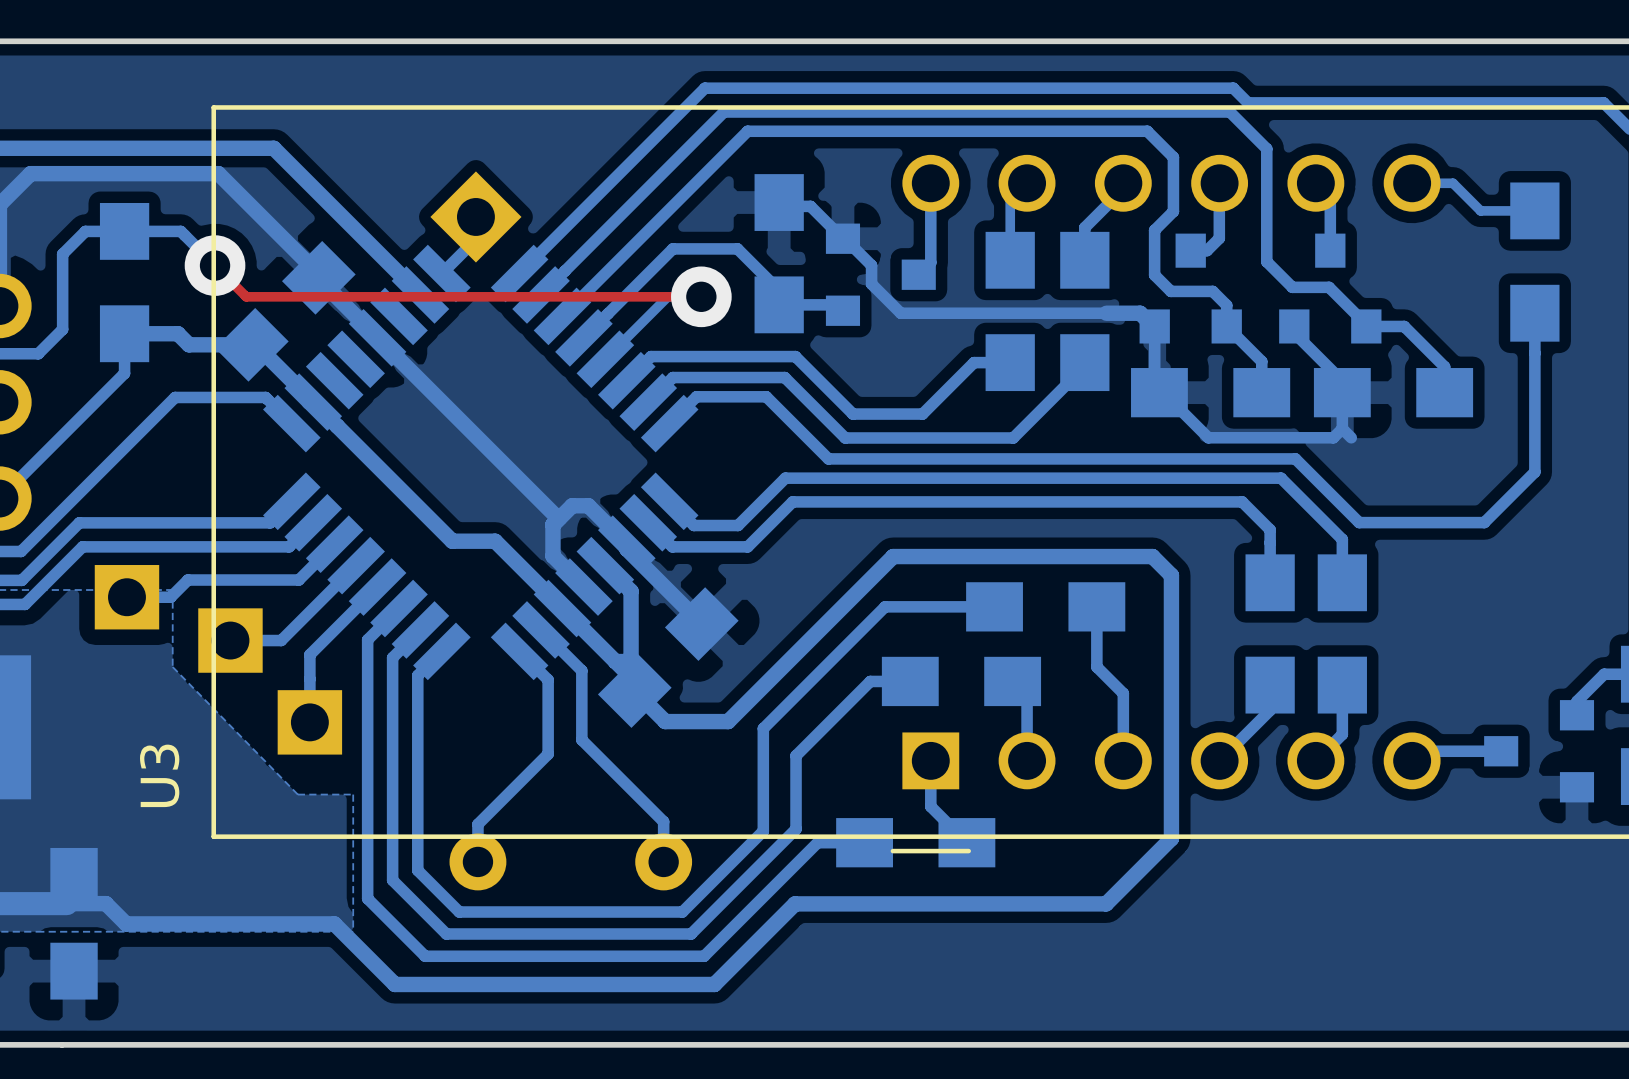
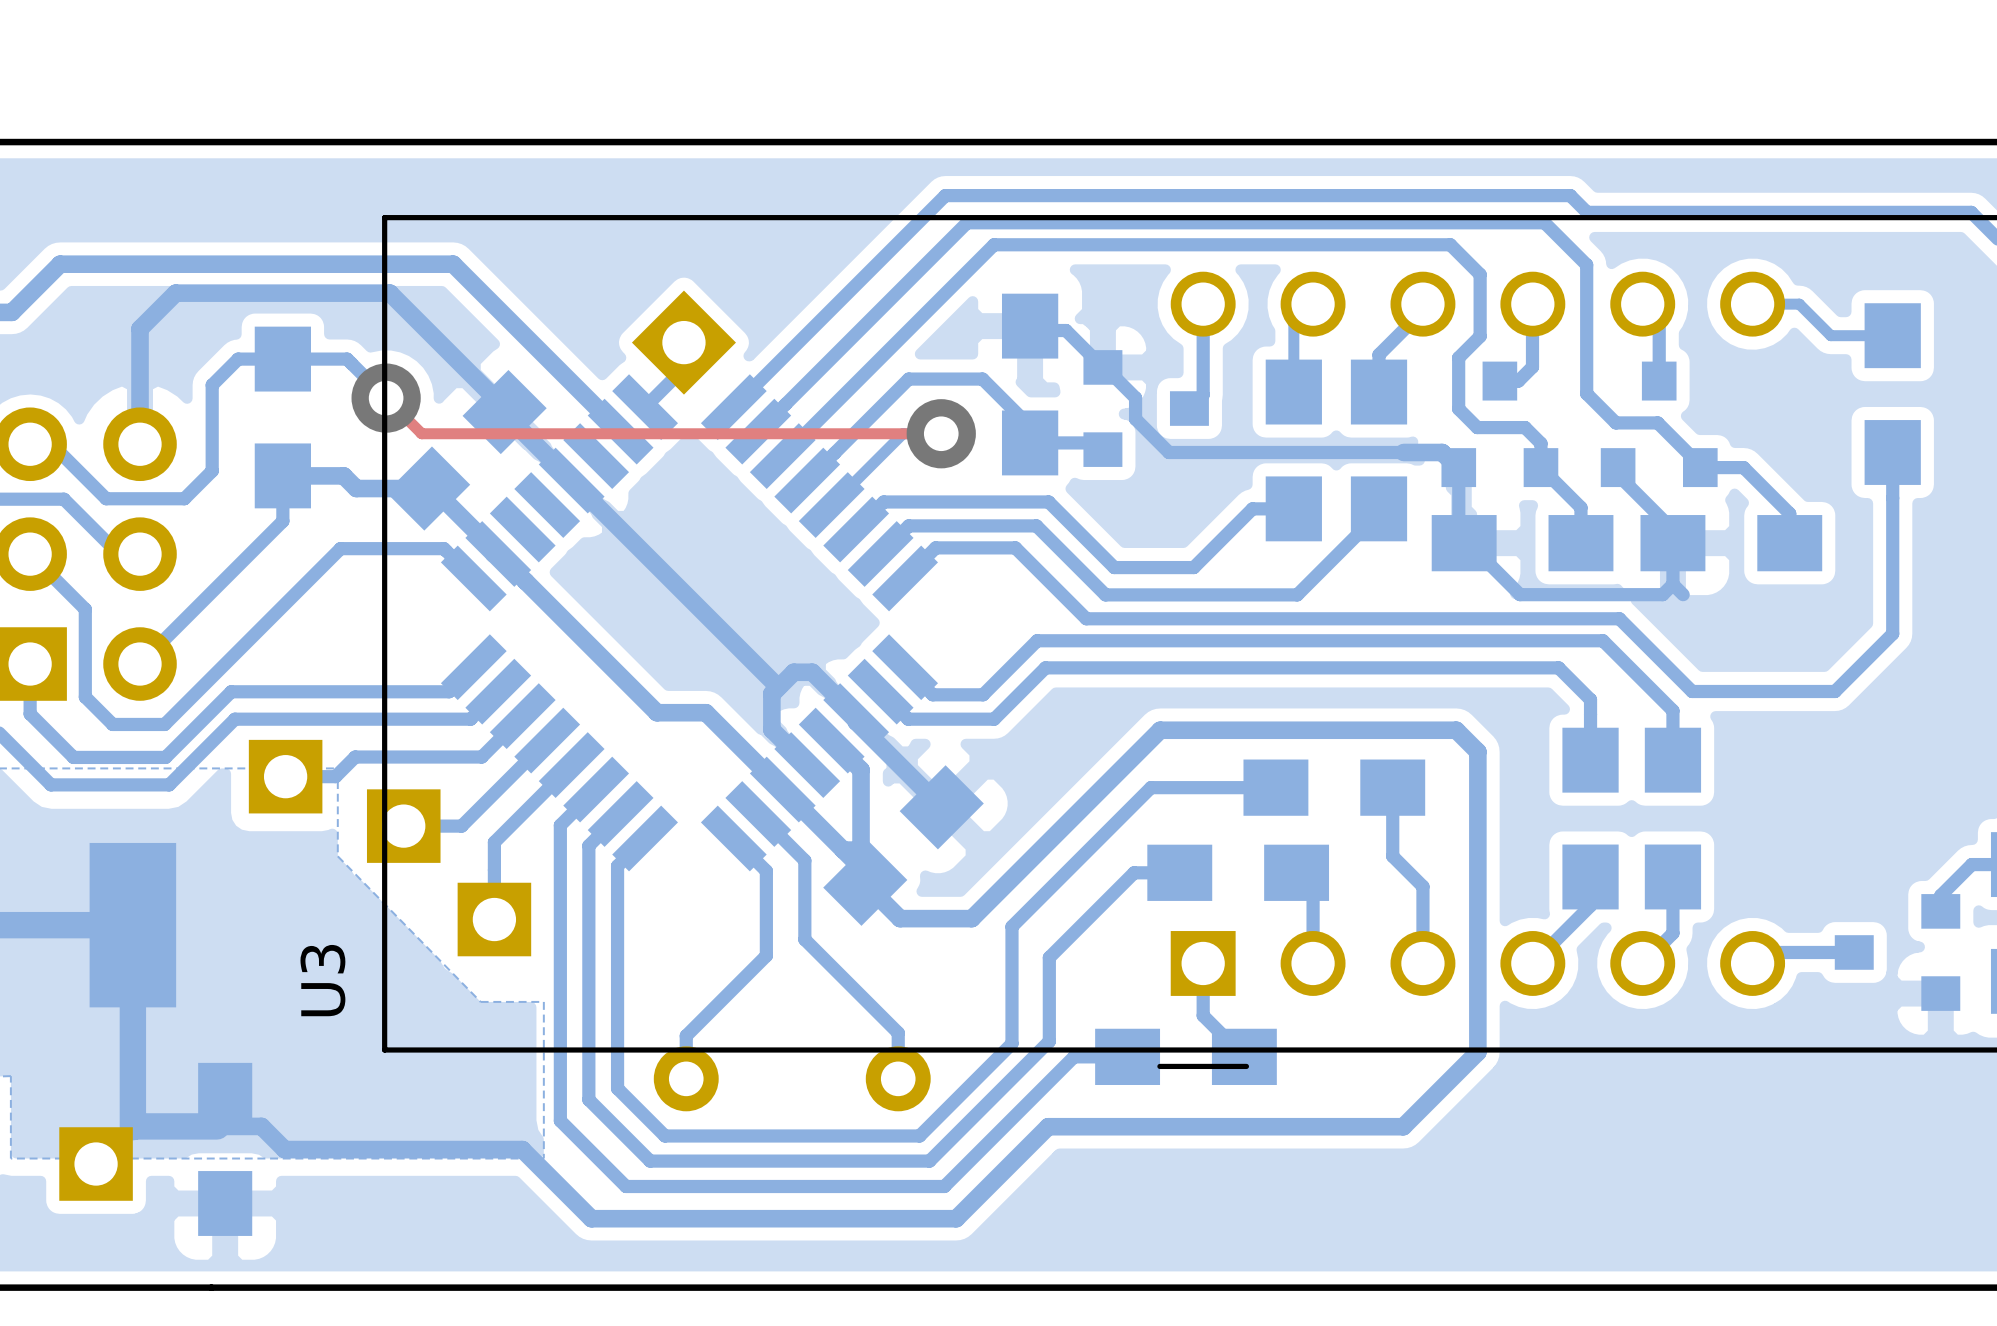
bottom track: (1233, 88) (1247, 102) (1267, 102) -> (1548, 195) (1570, 195) (1587, 212)

